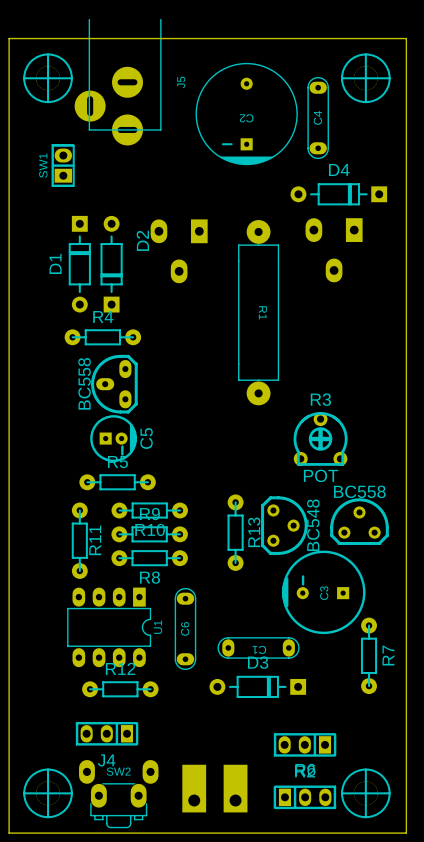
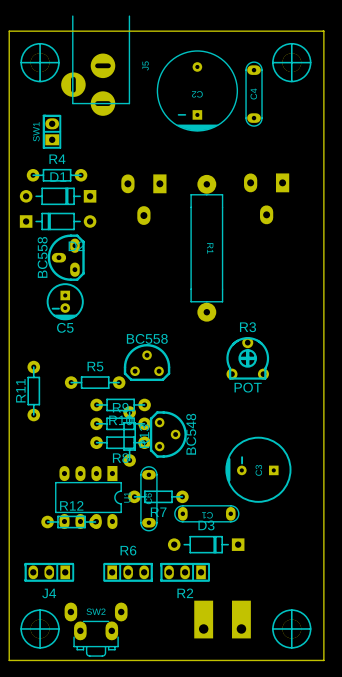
D4: (338, 194) -> none
D1 rotation: 0° (79, 264) -> 90° clockwise (58, 196)
D2 rotation: 0° (111, 264) -> 90° clockwise (58, 221)
R4 position: (102, 337) -> (57, 175)
part position: (114, 384) -> (66, 257)
C5 rotation: 0° (113, 438) -> 90° clockwise (65, 301)
C5 position: (113, 438) -> (65, 301)
R3 position: (320, 438) -> (247, 358)
part position: (359, 521) -> (147, 362)
part position: (284, 525) -> (168, 434)
R13 position: (235, 532) -> (129, 436)
R11 position: (79, 540) -> (33, 391)
R11 name position: R11 (95, 540) -> R11 (20, 390)
R7 rotation: 0° (369, 655) -> 90° clockwise (158, 496)
R7 position: (369, 655) -> (158, 496)
R12 position: (120, 689) -> (71, 522)
J4 position: (107, 733) -> (49, 572)
R2 position: (305, 744) -> (185, 572)
part: none -> (241, 619)
part: (194, 788) -> none
part position: (235, 788) -> (203, 619)
R6 position: (304, 797) -> (127, 572)

